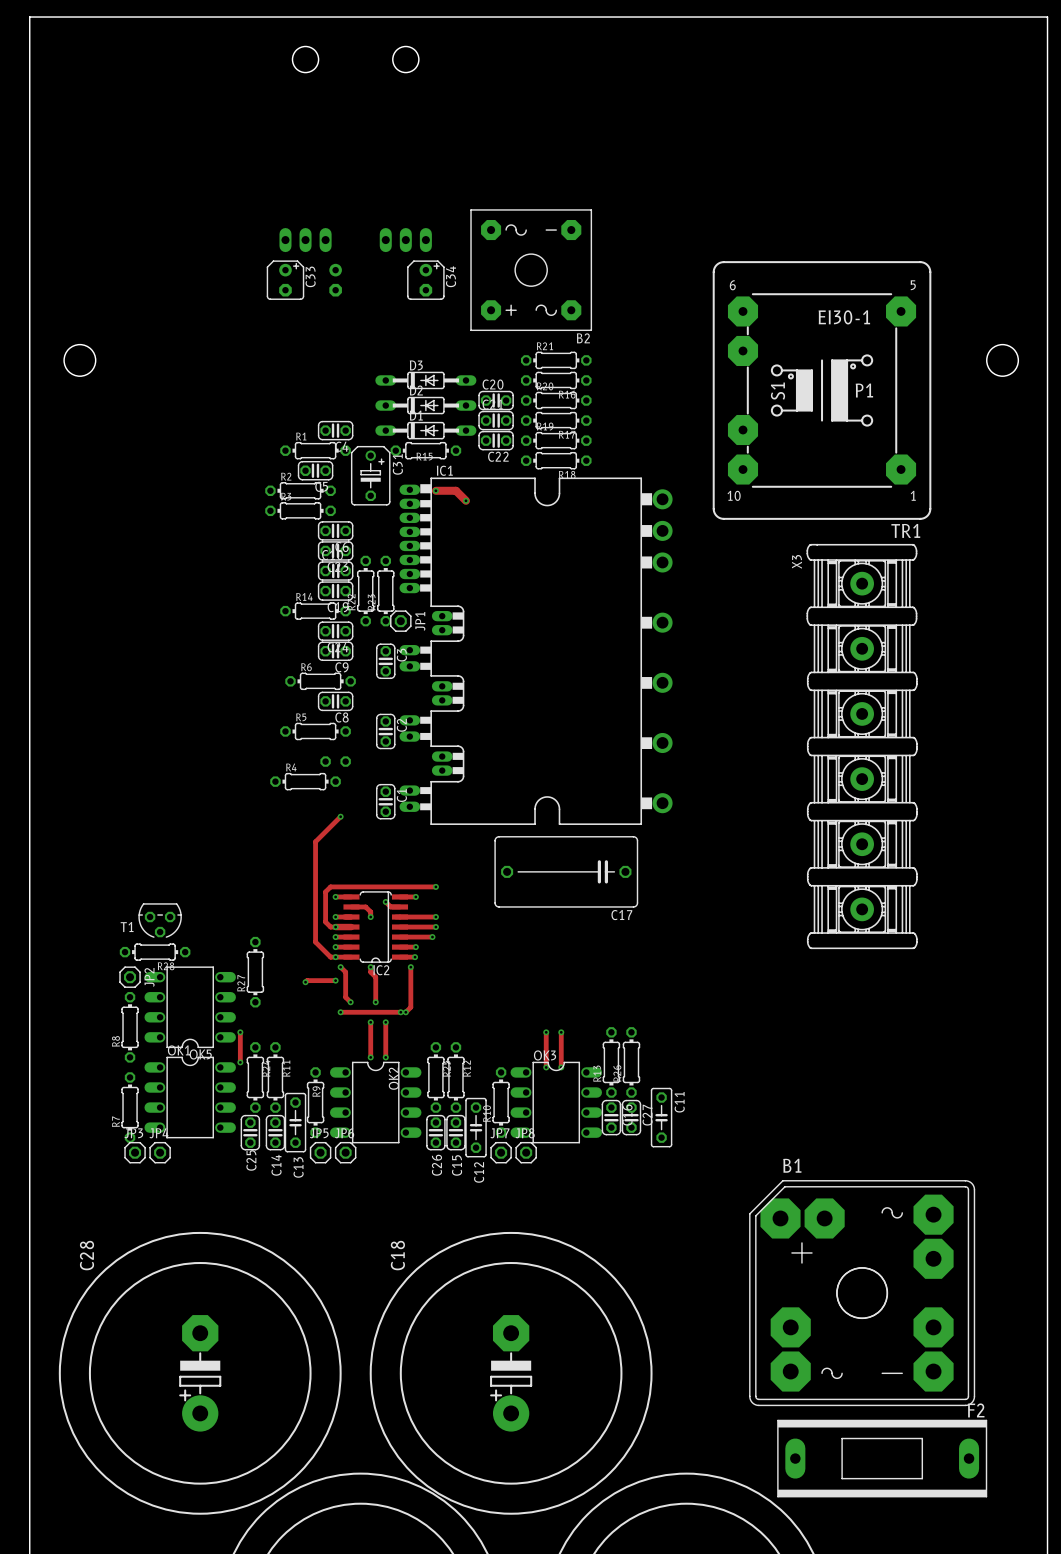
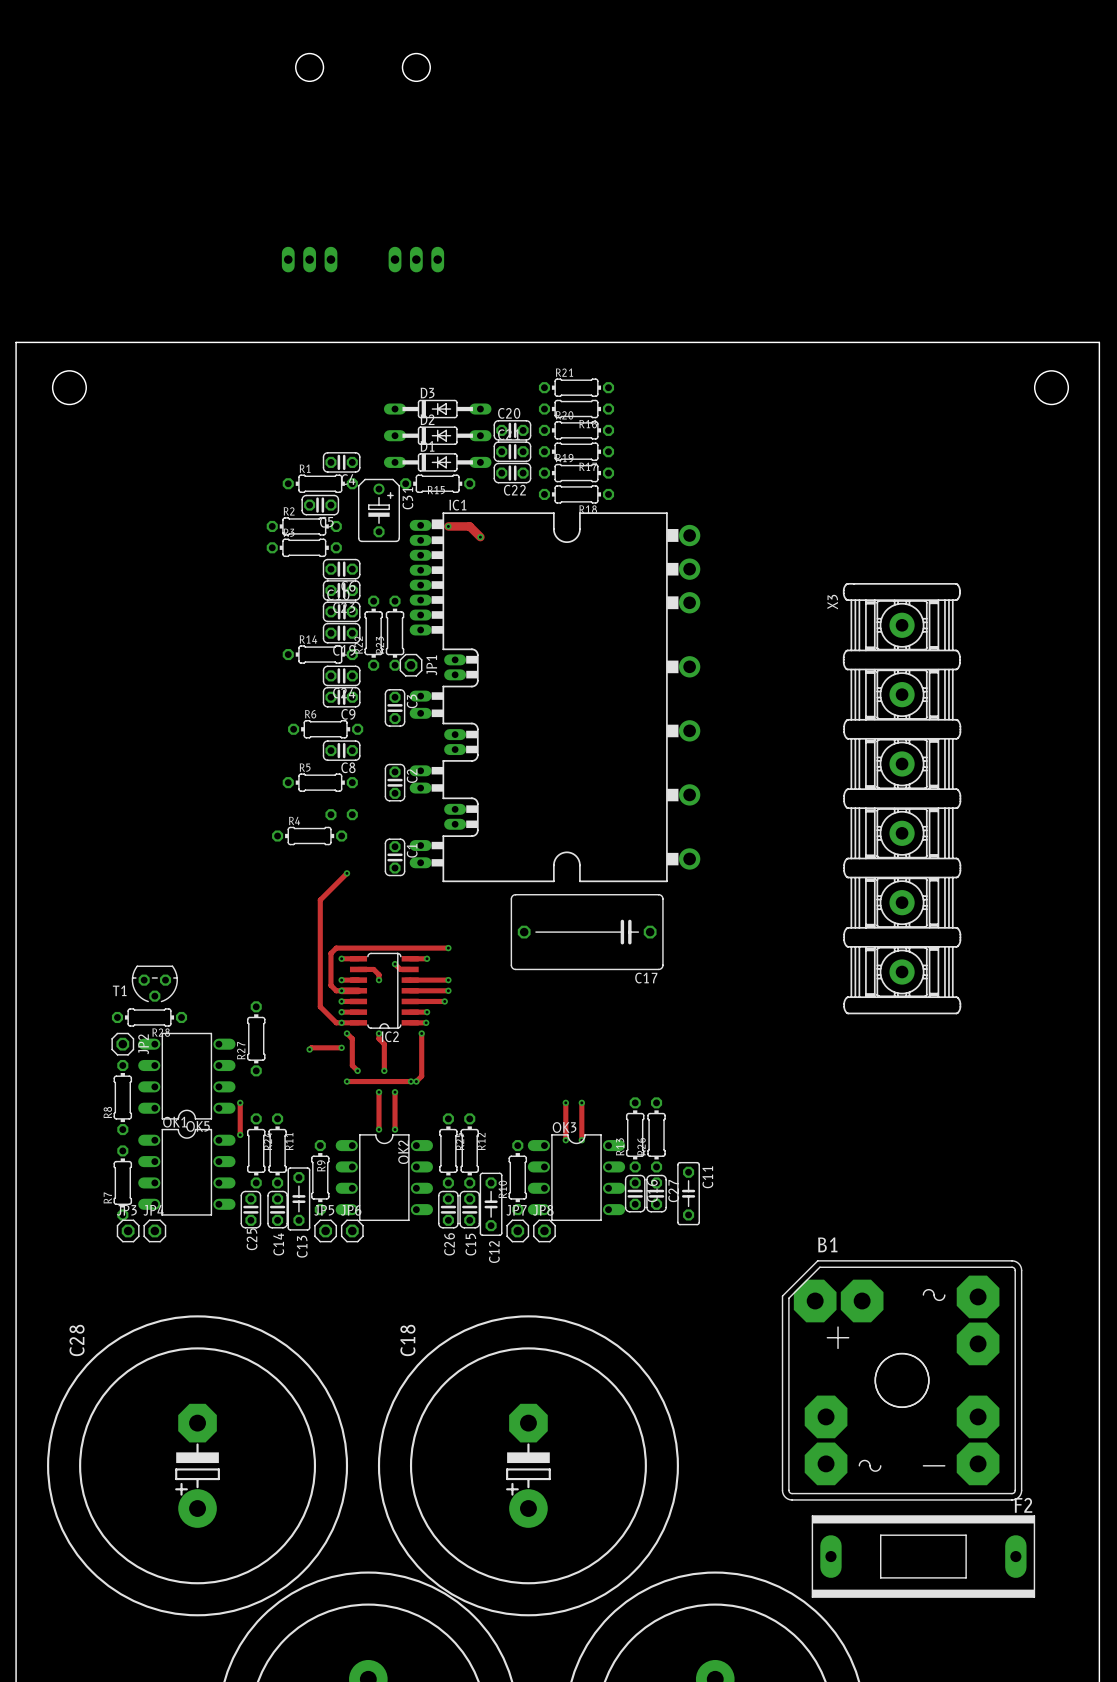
B2: (531, 270) -> none
C33: (285, 280) -> none
part: (335, 280) -> none
C34: (425, 280) -> none
board edge: (29, 317) (29, 17) (1047, 17) (1047, 317) -> (16, 342) (1099, 342)
TR1: (822, 390) -> none

